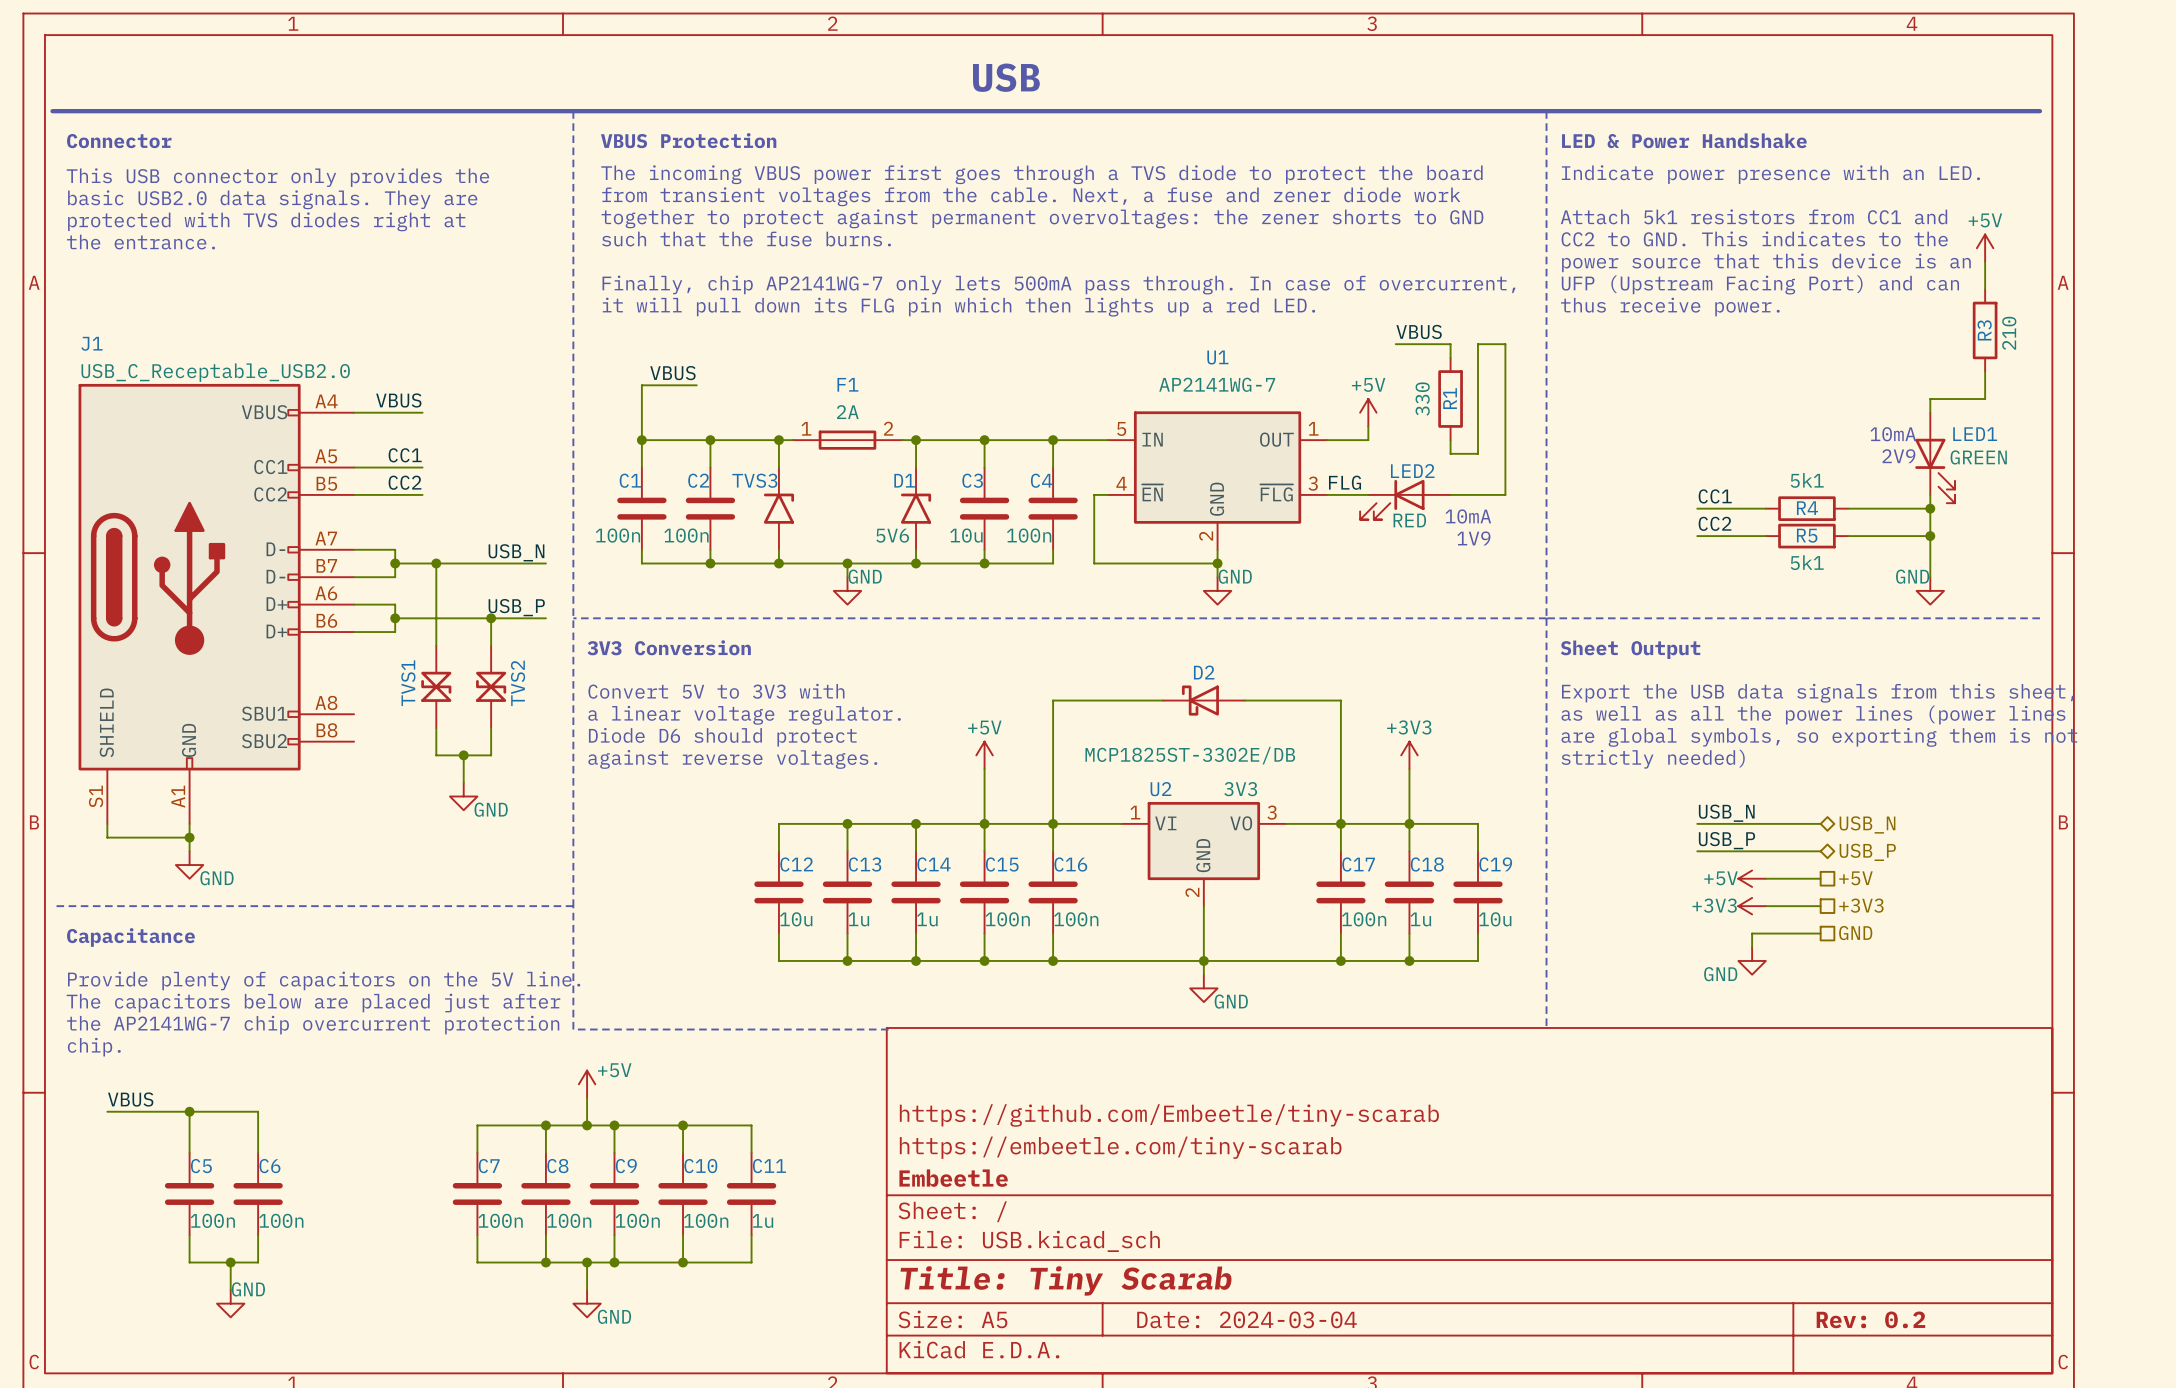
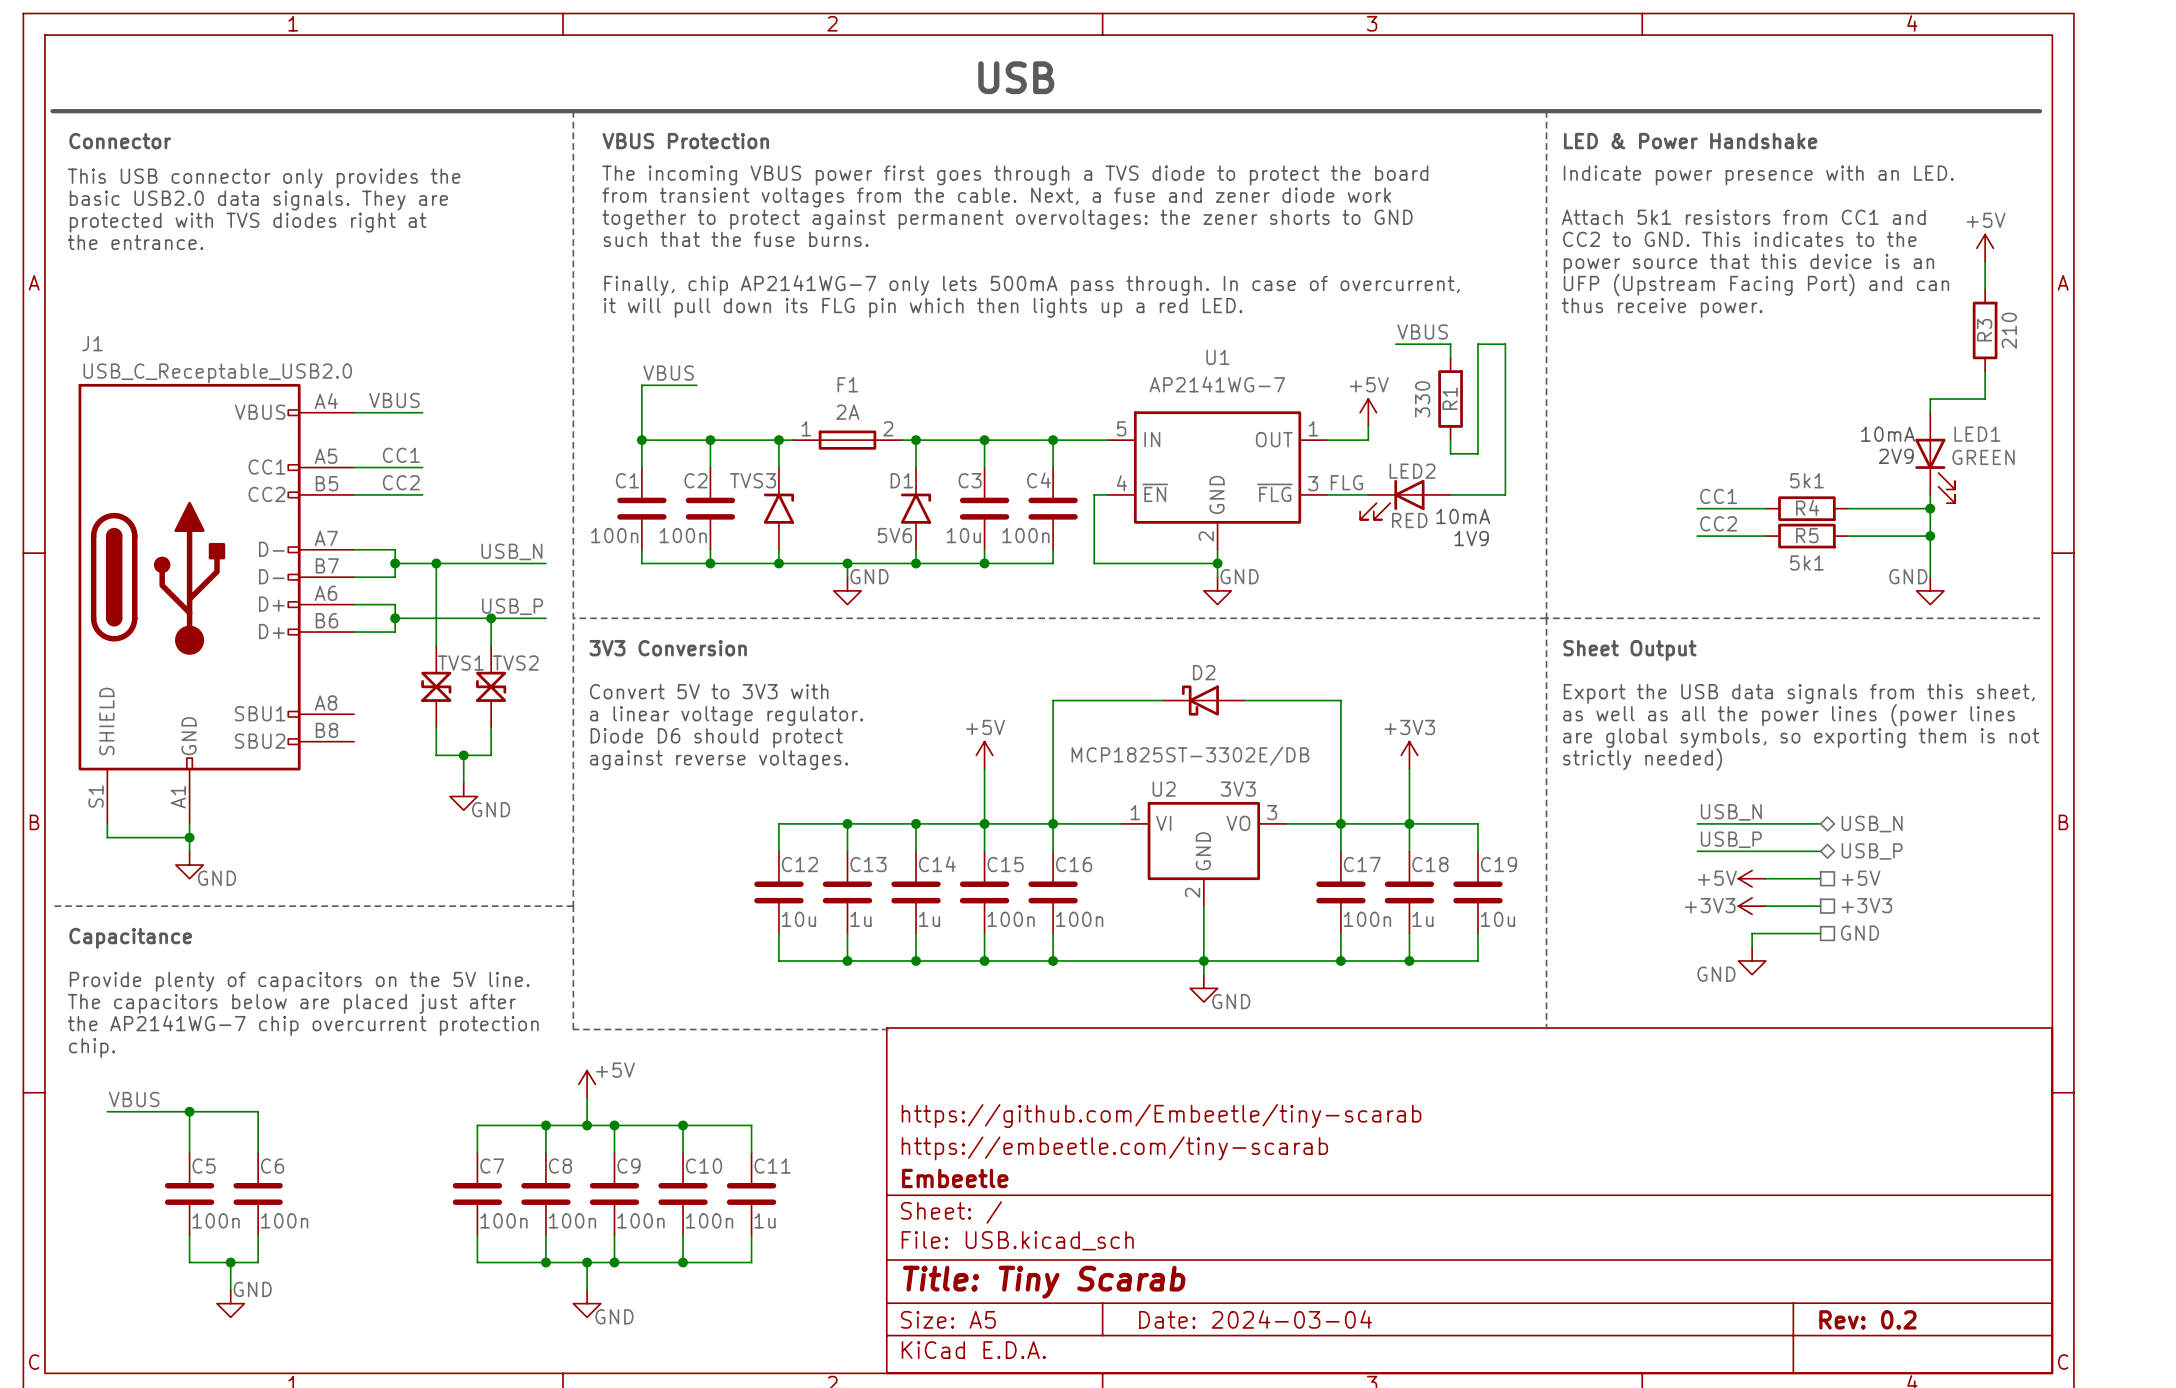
TVS1 name rotation: 0° (408, 683) -> 90° clockwise (460, 663)
TVS1 name position: TVS1 (408, 683) -> TVS1 (460, 663)
TVS2 name rotation: 0° (518, 683) -> 90° clockwise (515, 663)

